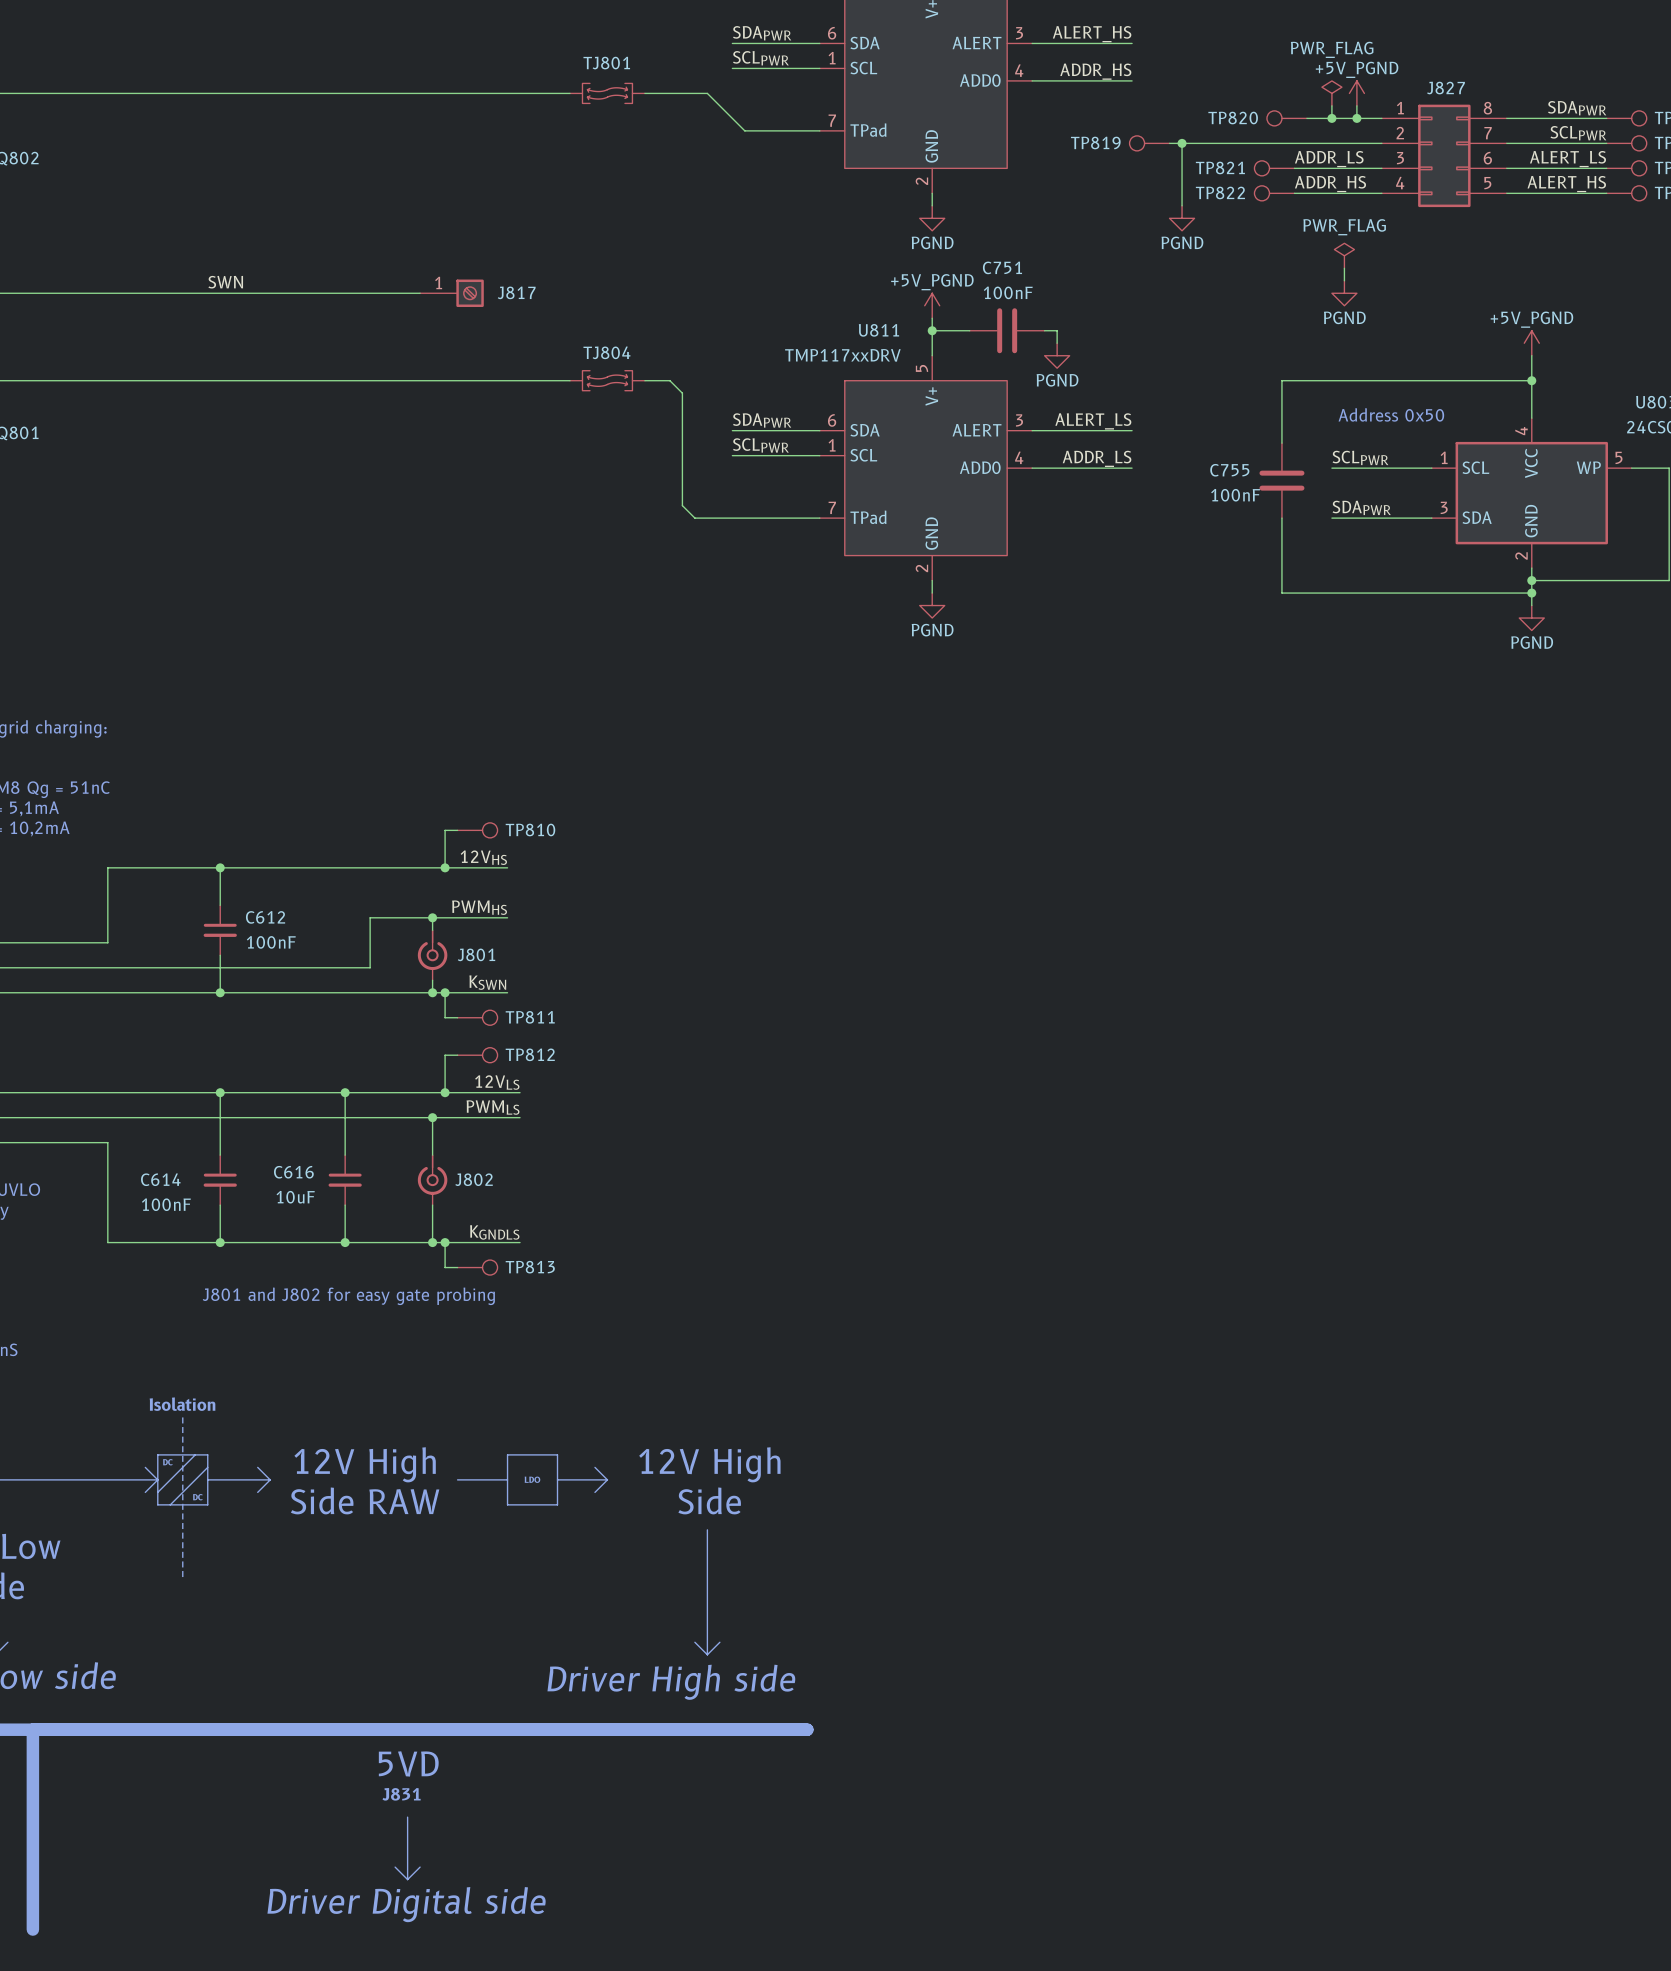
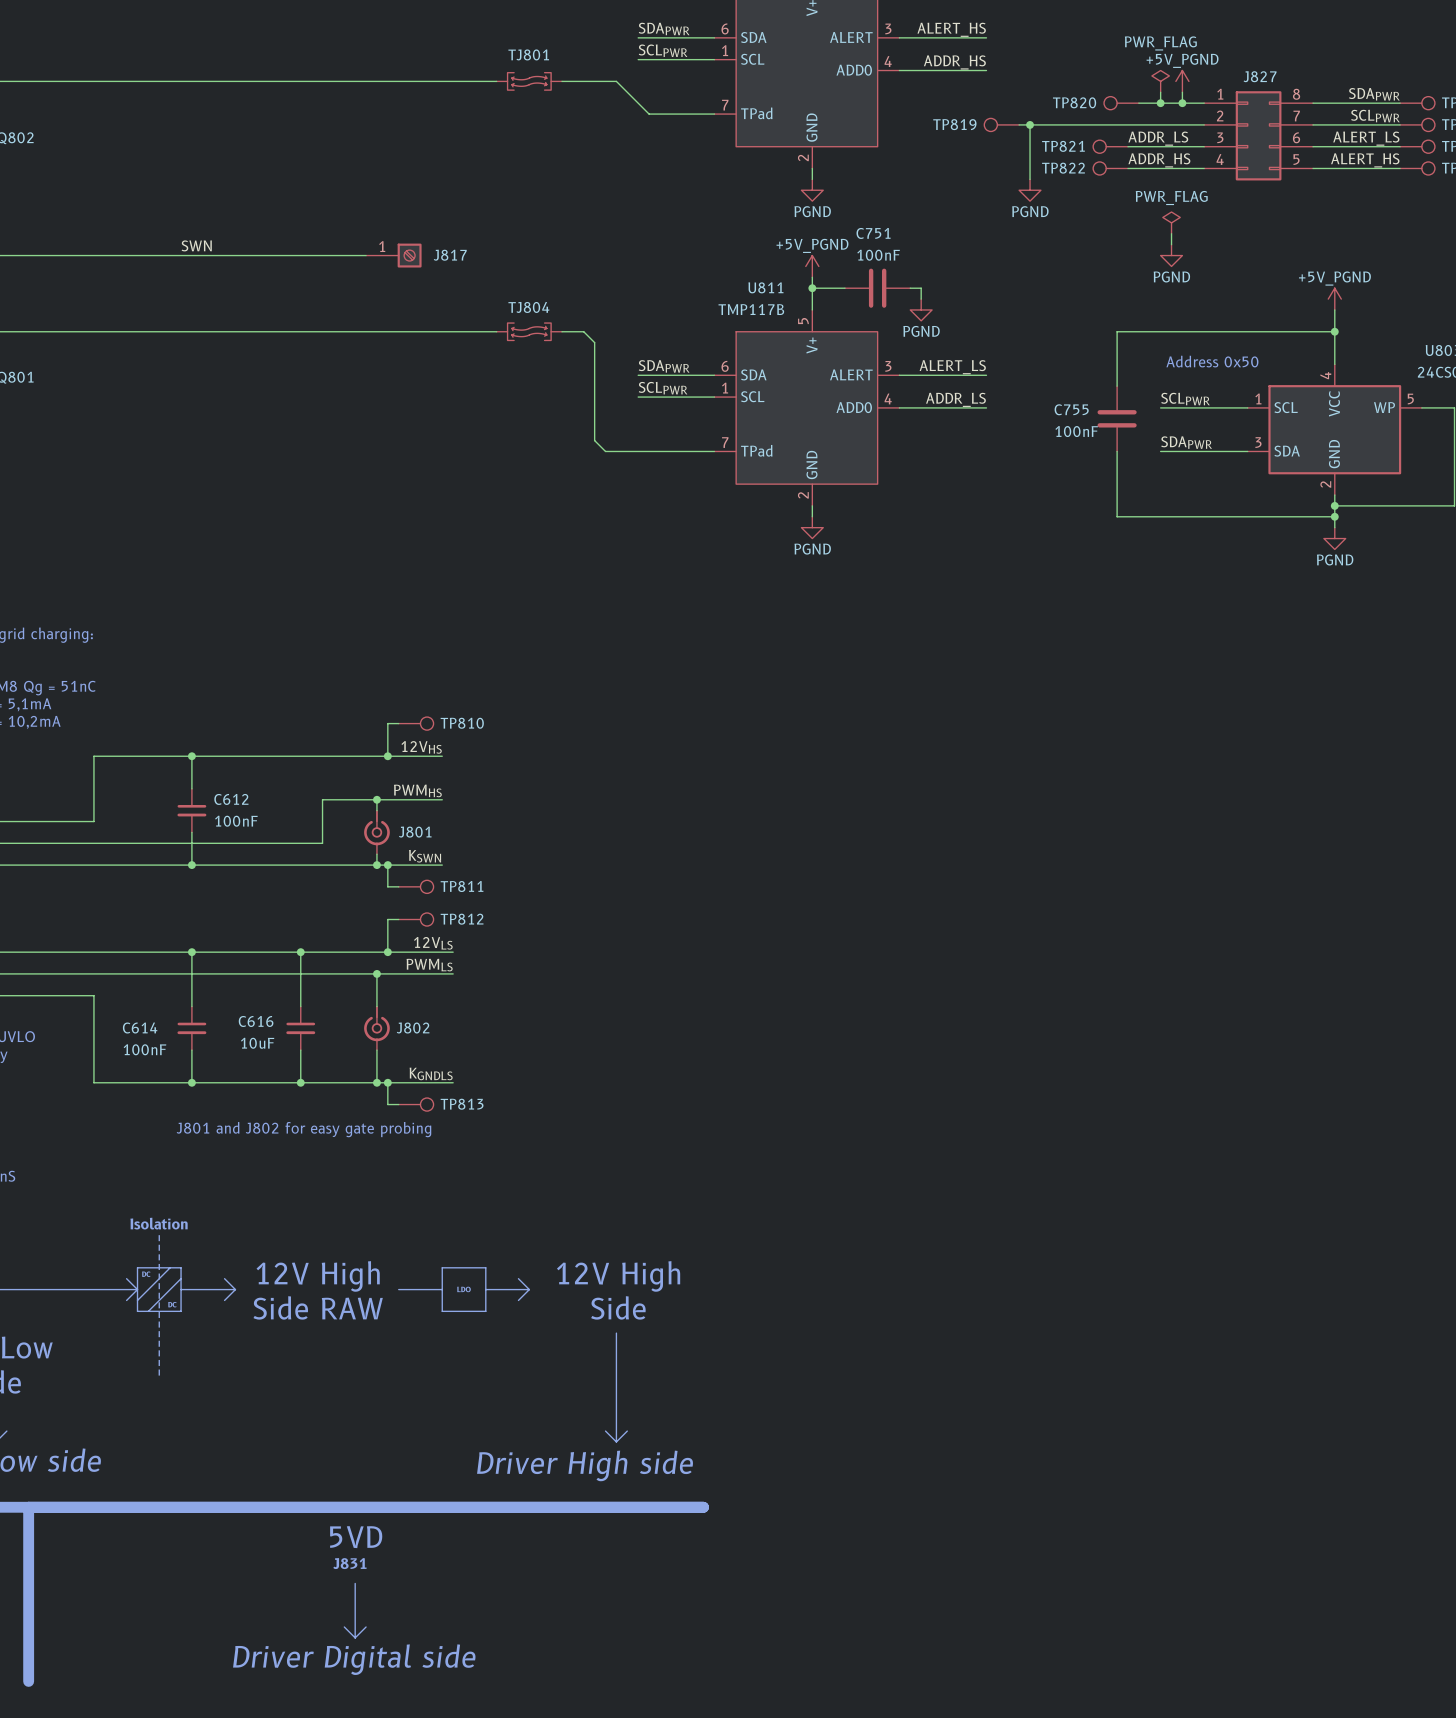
U811 value: TMP117xxDRV (842, 355) -> TMP117B (751, 309)

